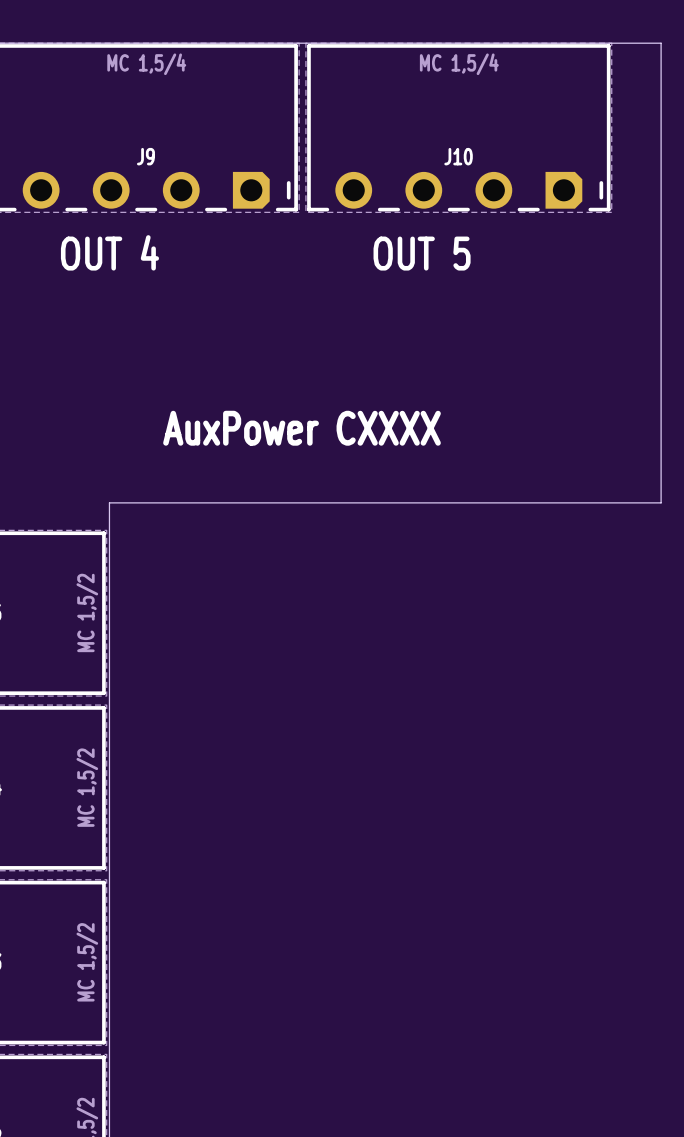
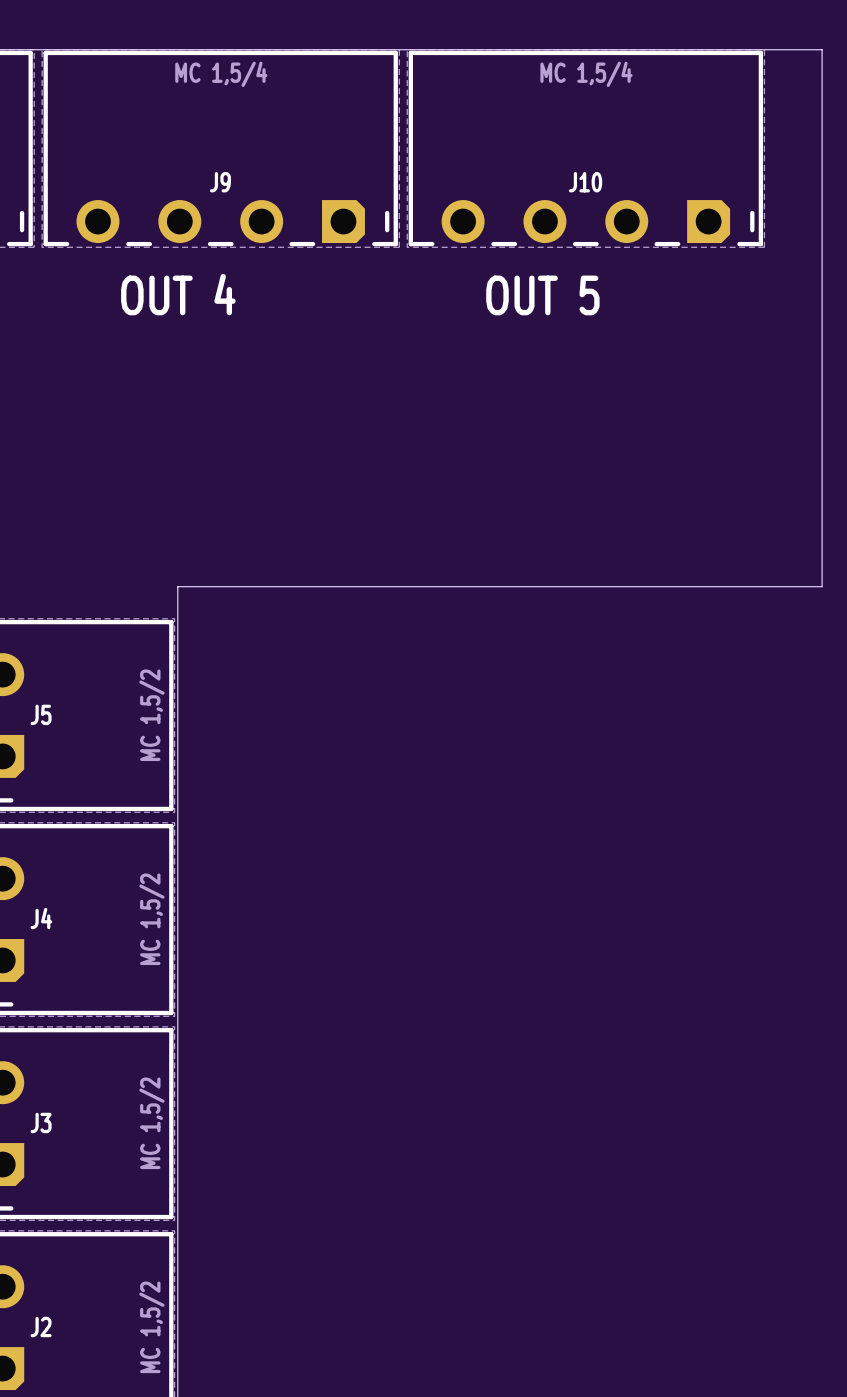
text: AuxPower CXXXX (302, 428) -> none

